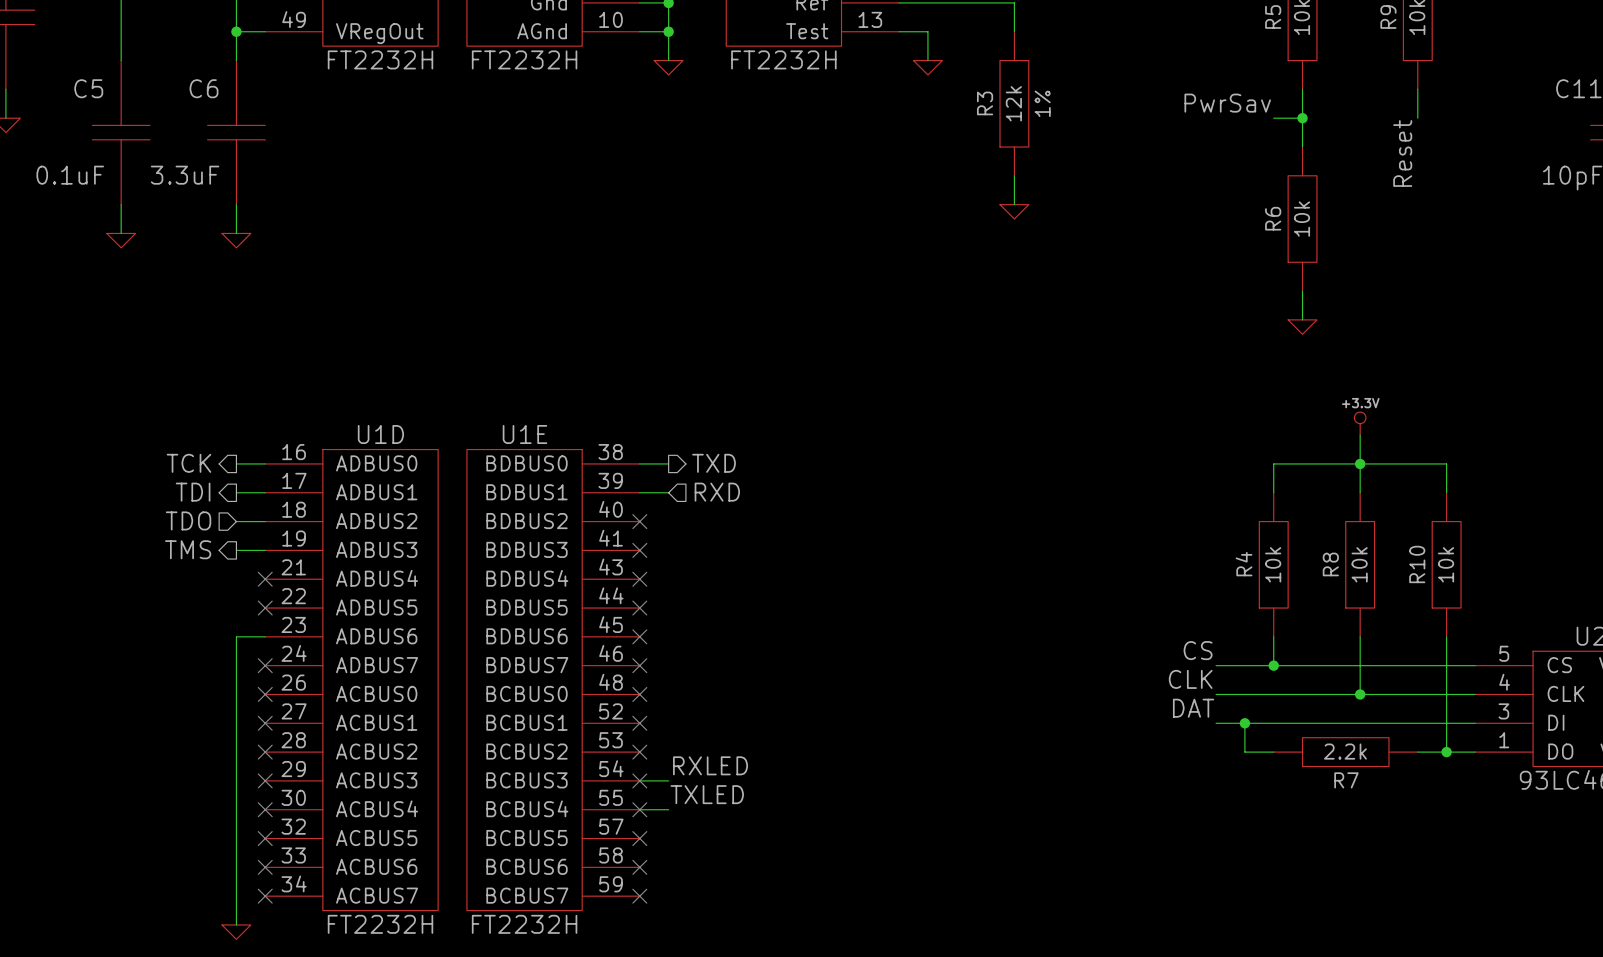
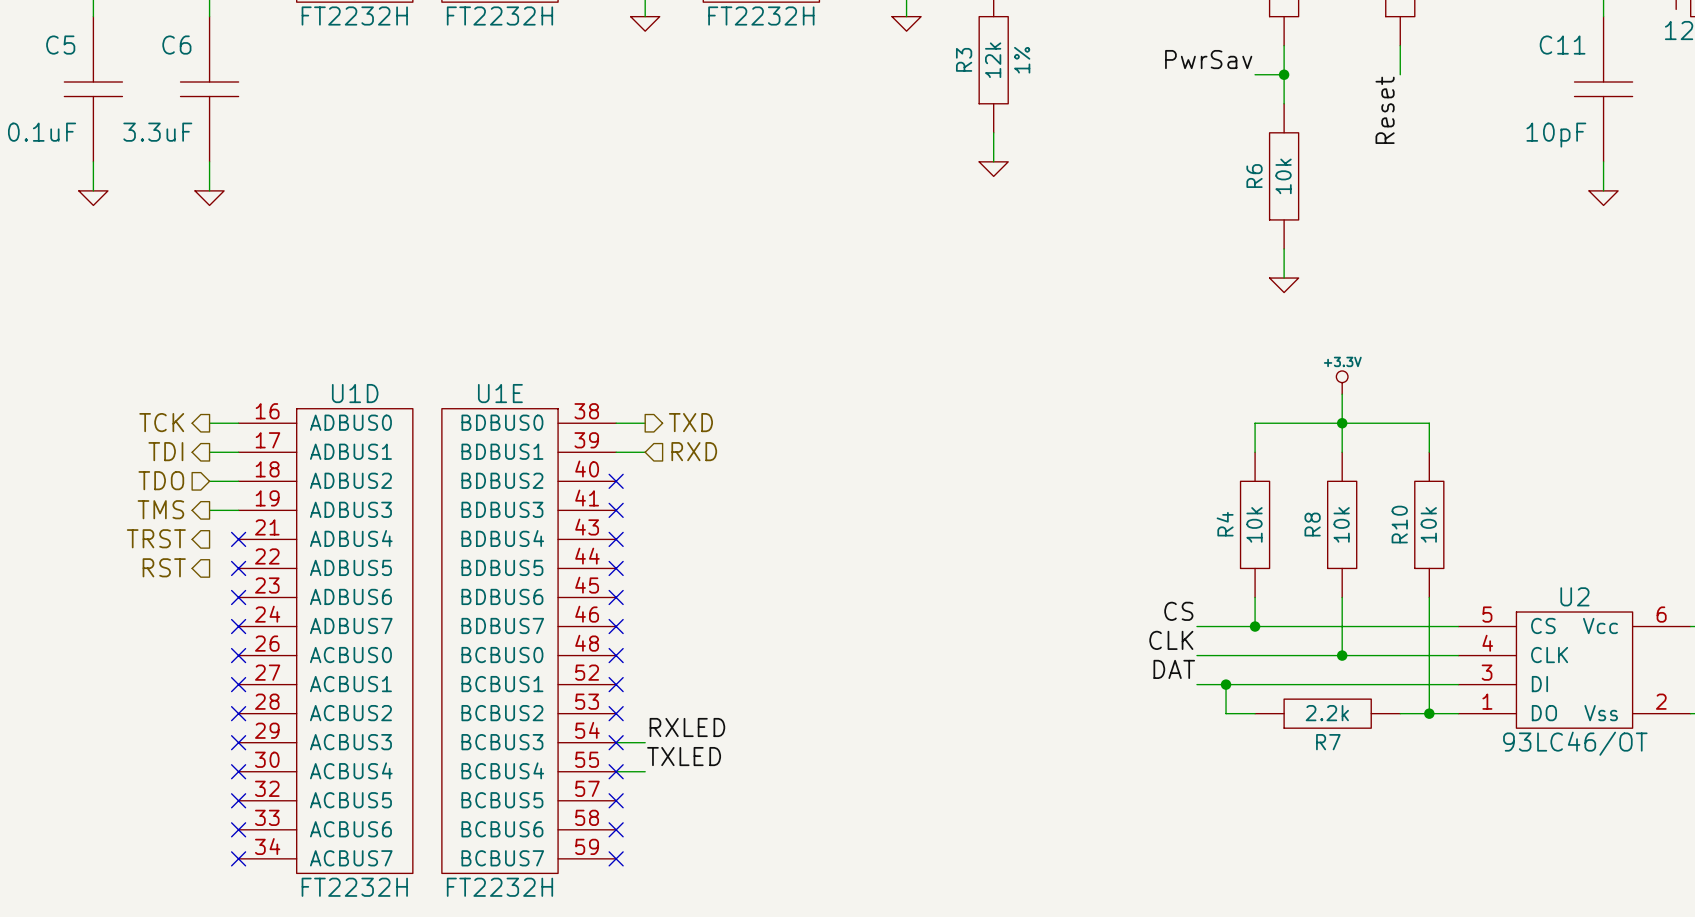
hierarchical label: none -> TRST (156, 538)
hierarchical label: none -> RST (164, 567)
wire: (265, 636) (236, 636) (236, 924) -> none
no-connect mark: none -> (238, 597)
power symbol: (236, 932) -> none

